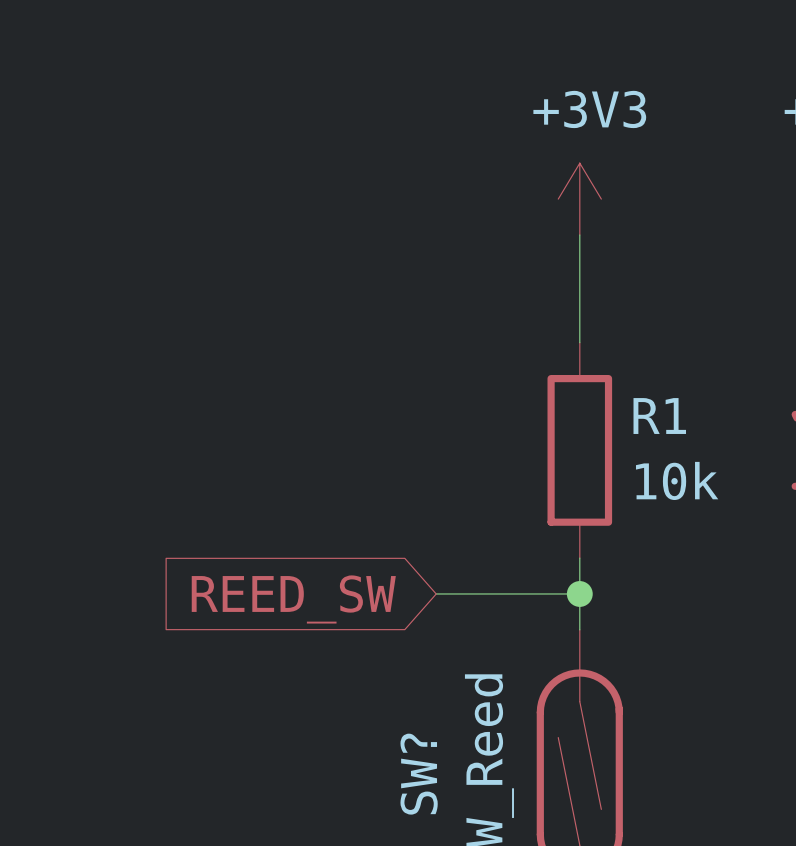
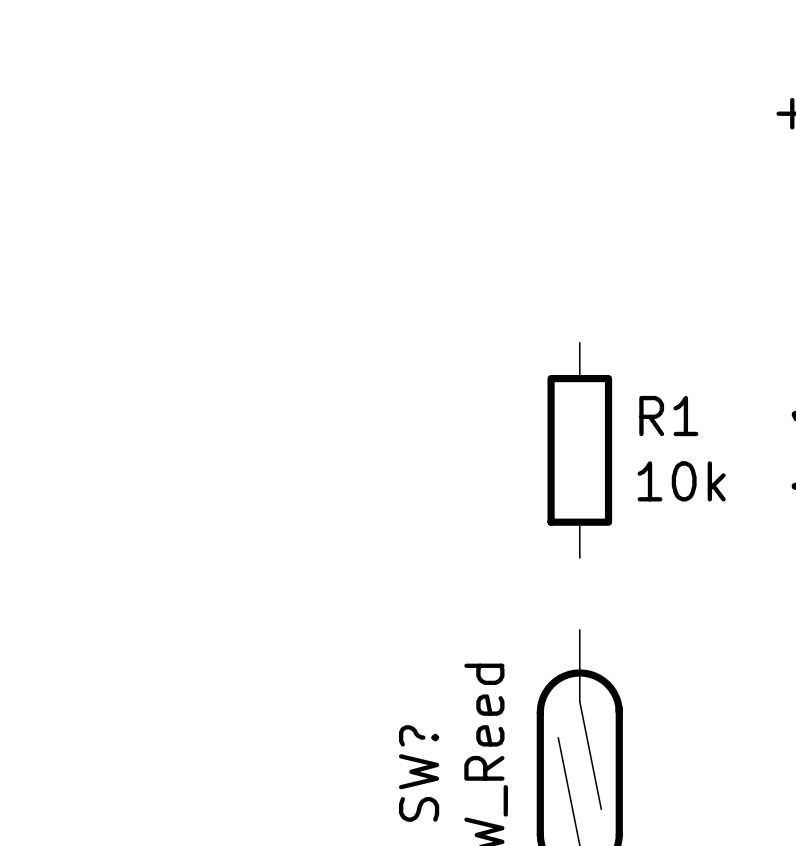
power symbol: +3V3 (579, 199) -> none
wire: (579, 234) (579, 342) -> none
wire: (579, 558) (579, 629) -> none
wire: (436, 593) (579, 593) -> none
junction: (579, 593) -> none
global label: REED_SW (293, 599) -> none

